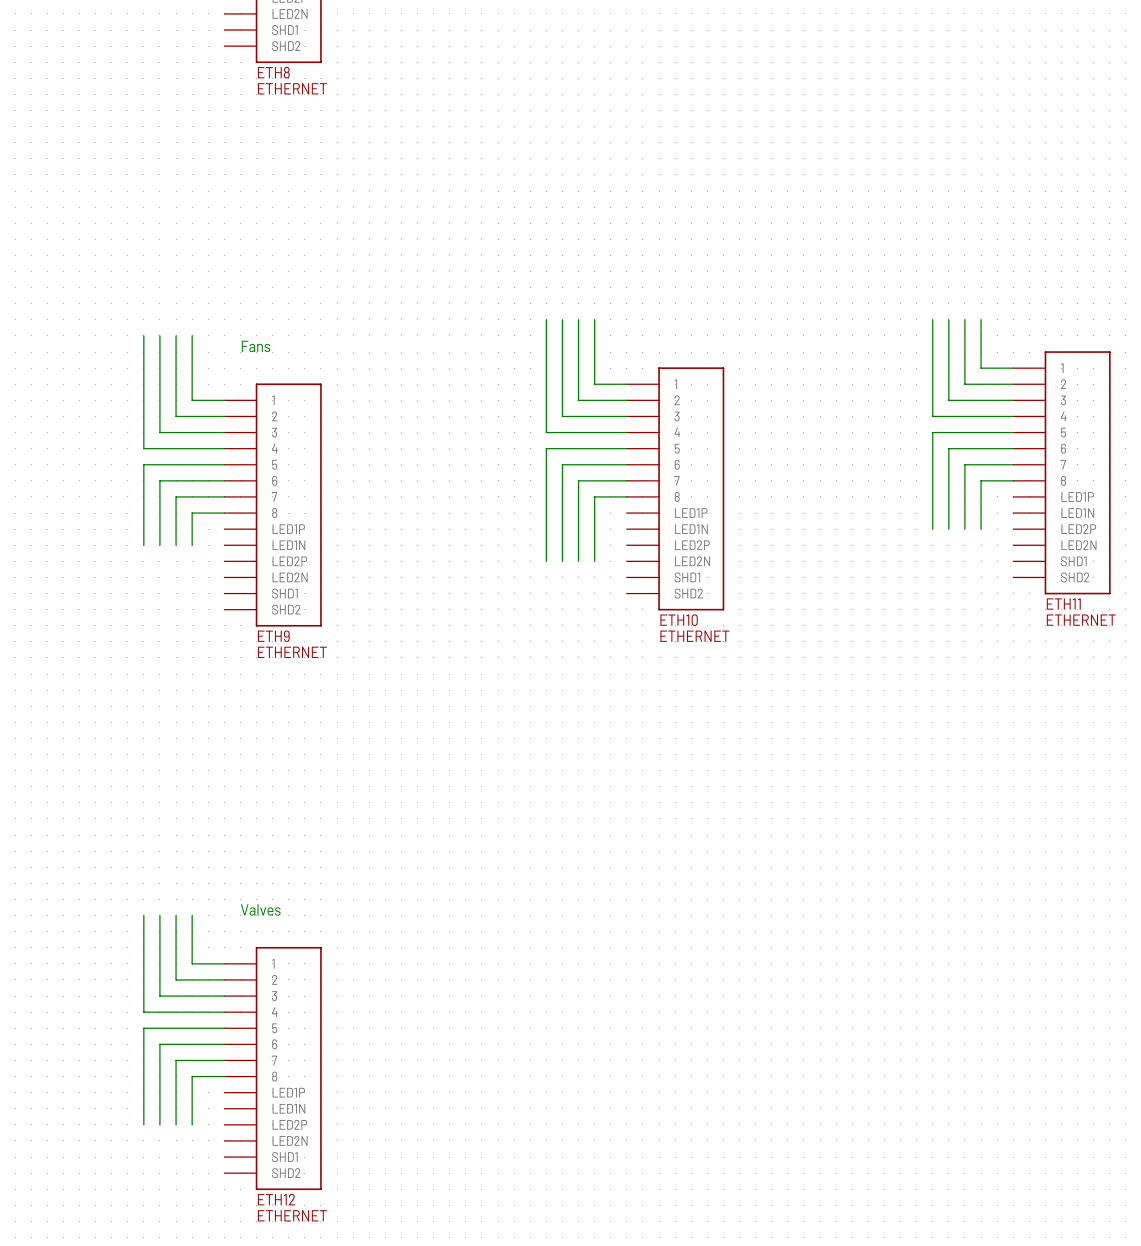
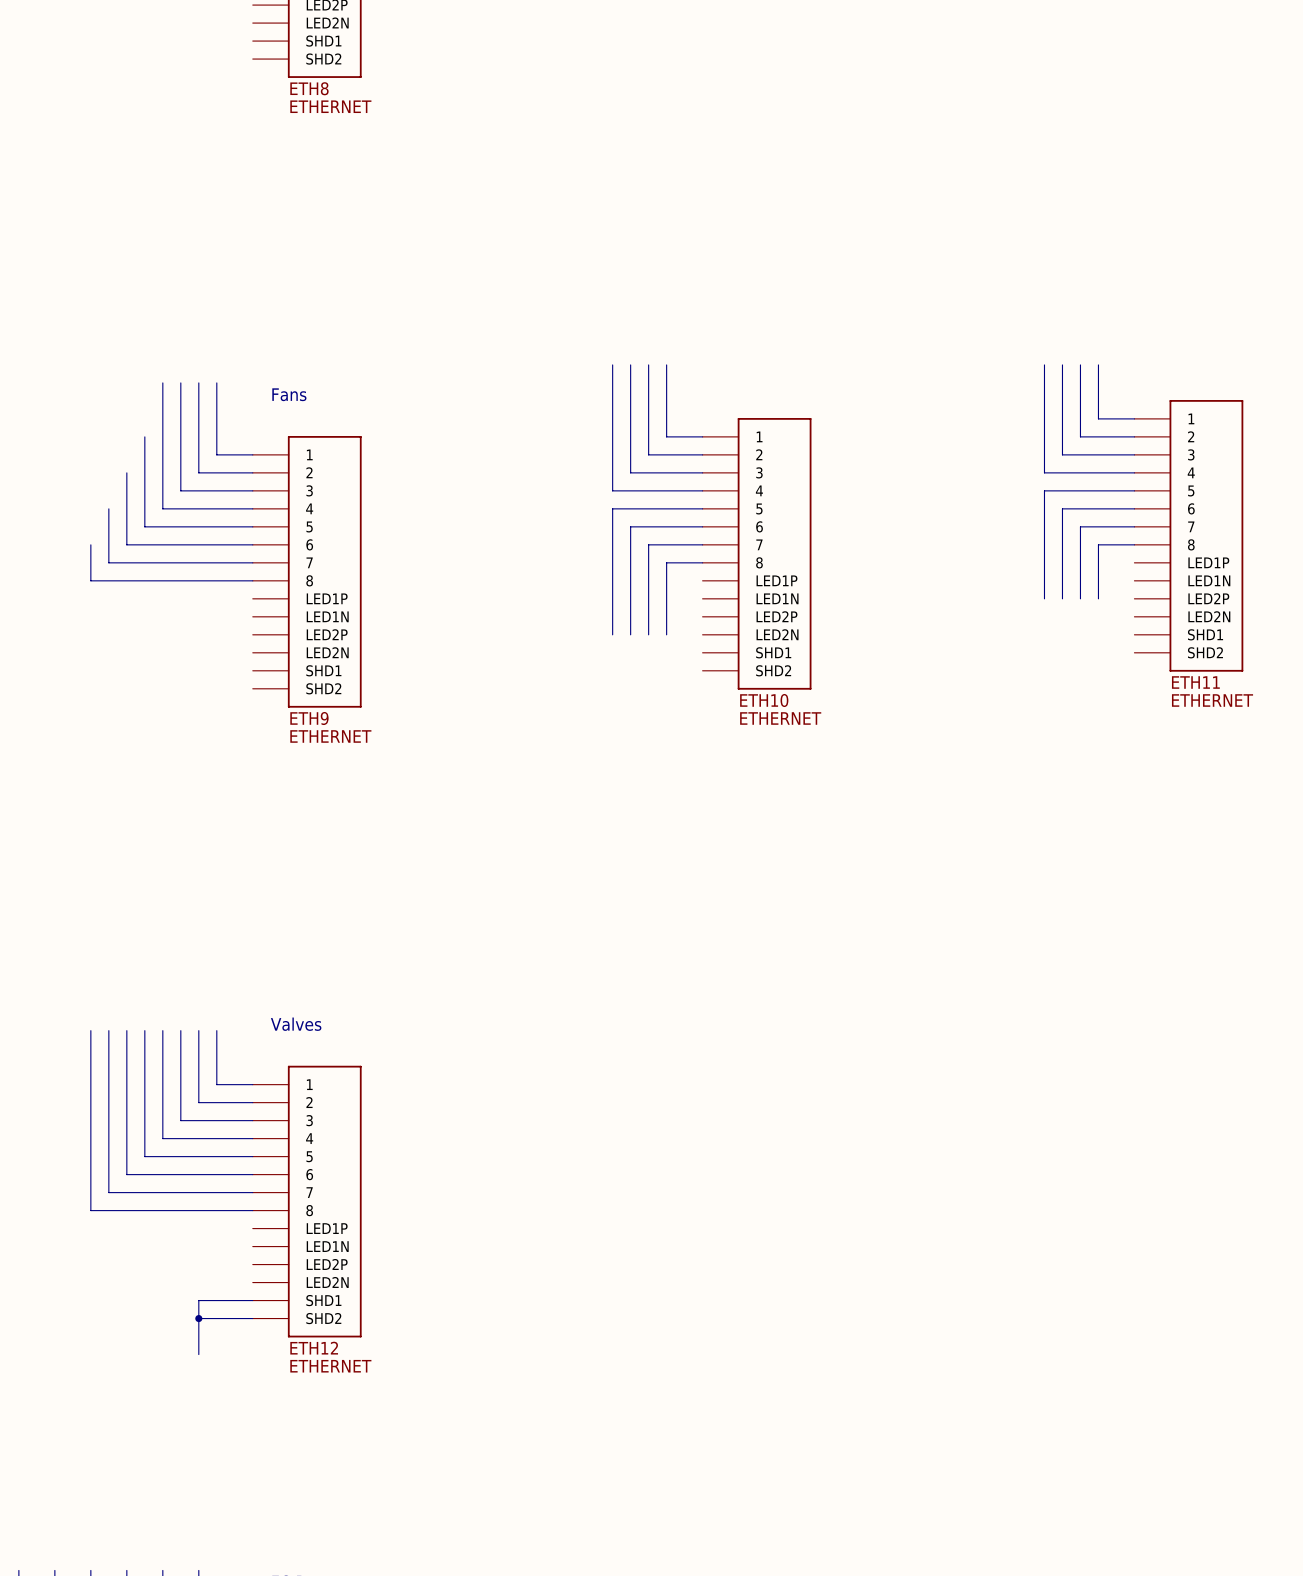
wire: (143, 464) (143, 545) -> (162, 526) (144, 526) (144, 436)
wire: (159, 480) (159, 545) -> (180, 544) (126, 544) (126, 472)
wire: (176, 496) (176, 545) -> (198, 562) (108, 562) (108, 508)
wire: (192, 513) (192, 545) -> (216, 580) (90, 580) (90, 544)
wire: (143, 1028) (143, 1124) -> (162, 1156) (144, 1156) (144, 1030)
wire: (159, 1044) (159, 1124) -> (180, 1174) (126, 1174) (126, 1030)
wire: (176, 1060) (176, 1124) -> (198, 1192) (108, 1192) (108, 1030)
wire: (192, 1076) (192, 1124) -> (216, 1210) (90, 1210) (90, 1030)
wire: none -> (252, 1300) (198, 1300) (198, 1354)
wire: none -> (198, 1318) (252, 1318)
junction: none -> (198, 1318)

